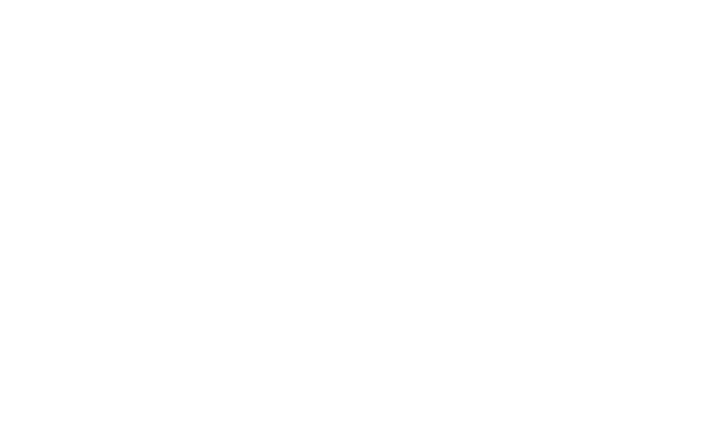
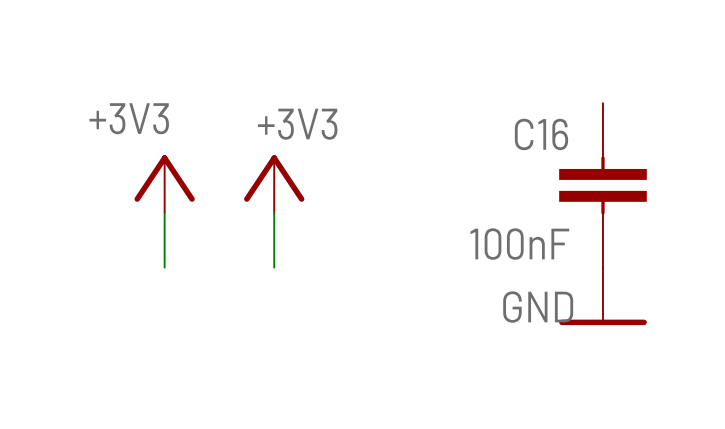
power symbol: none -> +3V3 (164, 184)
power symbol: none -> +3V3 (274, 184)
C16: none -> 100nF (602, 185)
wire: none -> (164, 212) (164, 267)
wire: none -> (274, 212) (274, 267)
power symbol: none -> GND (602, 296)

